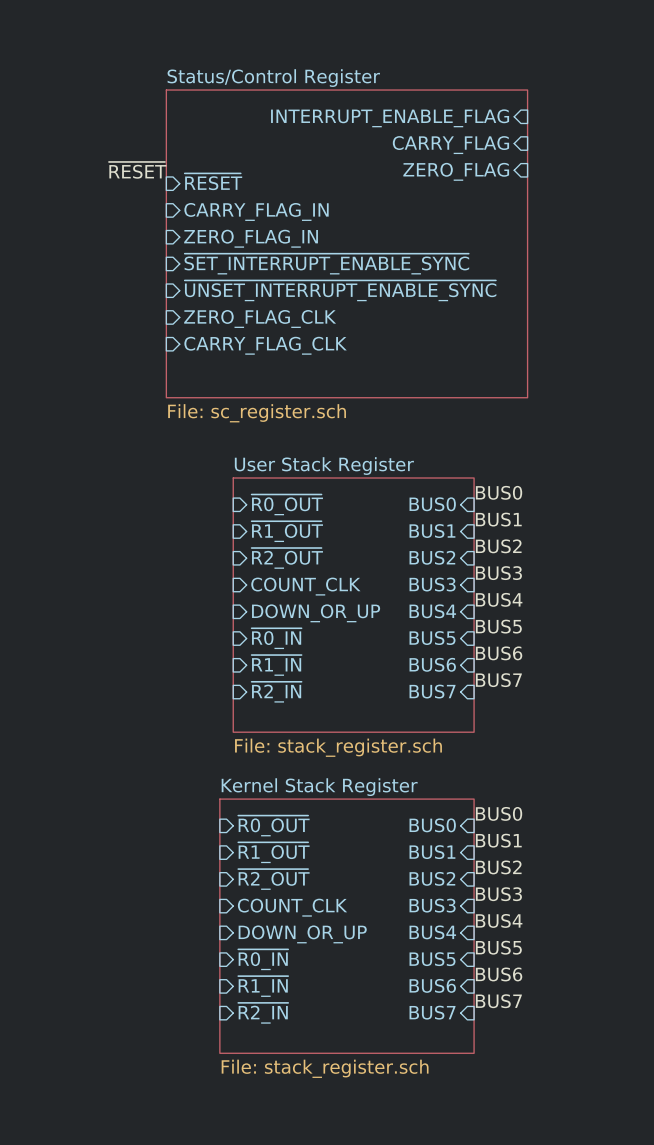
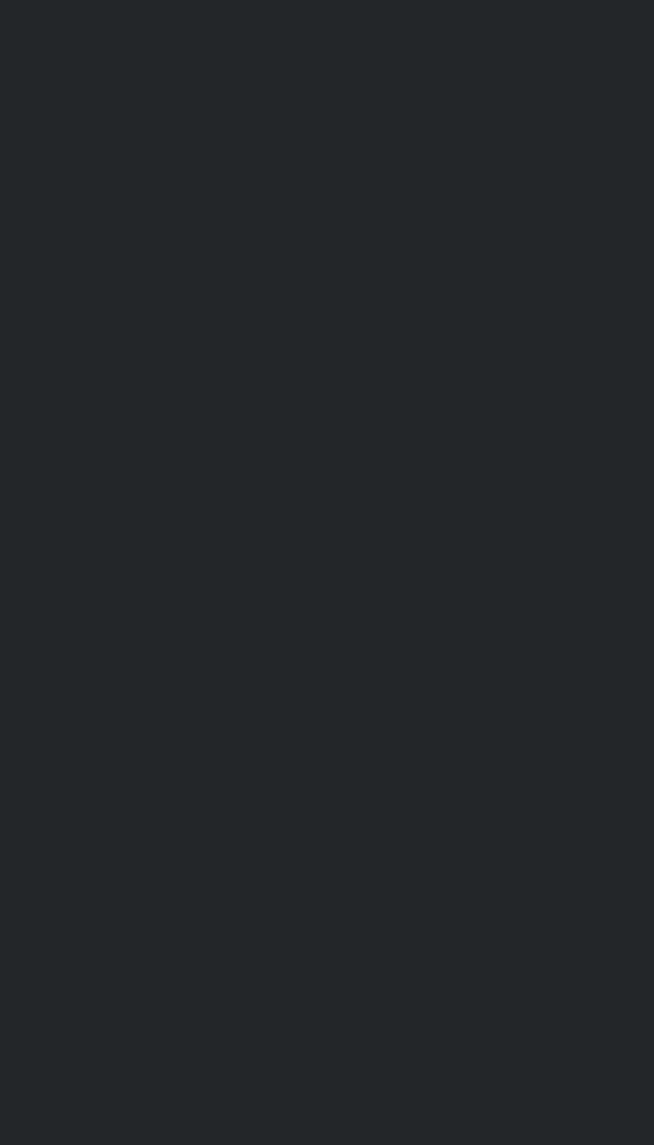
sheet pin: INTERRUPT_ENABLE_FLAG (390, 118) -> none
sheet pin: CARRY_FLAG (450, 145) -> none
label: ~{RESET} (137, 170) -> none
sheet pin: ZERO_FLAG (456, 171) -> none
sheet pin: ~{RESET} (213, 181) -> none
sheet pin: CARRY_FLAG_IN (256, 211) -> none
sheet pin: ZERO_FLAG_IN (251, 238) -> none
sheet Status/Control Register: File: sc_register.sch (346, 243) -> none
sheet pin: ~{SET_INTERRUPT_ENABLE_SYNC} (326, 264) -> none
sheet pin: ~{UNSET_INTERRUPT_ENABLE_SYNC} (340, 290) -> none
sheet pin: ZERO_FLAG_CLK (260, 319) -> none
sheet pin: CARRY_FLAG_CLK (265, 345) -> none
label: BUS0 (499, 492) -> none
sheet pin: ~{R0_OUT} (287, 504) -> none
sheet pin: BUS0 (432, 504) -> none
label: BUS1 (498, 519) -> none
sheet pin: ~{R1_OUT} (287, 531) -> none
sheet pin: BUS1 (432, 531) -> none
label: BUS2 (498, 546) -> none
sheet pin: BUS2 (432, 557) -> none
sheet pin: ~{R2_OUT} (287, 558) -> none
label: BUS3 (498, 573) -> none
sheet pin: BUS3 (432, 584) -> none
sheet pin: COUNT_CLK (305, 586) -> none
label: BUS4 (499, 599) -> none
sheet User Stack Register: File: stack_register.sch (353, 605) -> none
sheet pin: BUS4 (432, 611) -> none
sheet pin: DOWN_OR_UP (316, 613) -> none
label: BUS5 (498, 626) -> none
sheet pin: ~{R0_IN} (276, 638) -> none
sheet pin: BUS5 (432, 638) -> none
label: BUS6 (499, 653) -> none
sheet pin: BUS6 (432, 664) -> none
sheet pin: ~{R1_IN} (276, 665) -> none
label: BUS7 (498, 680) -> none
sheet pin: BUS7 (432, 691) -> none
sheet pin: ~{R2_IN} (276, 692) -> none
label: BUS0 (499, 813) -> none
sheet pin: ~{R0_OUT} (273, 825) -> none
sheet pin: BUS0 (432, 825) -> none
label: BUS1 (498, 840) -> none
sheet pin: ~{R1_OUT} (273, 852) -> none
sheet pin: BUS1 (432, 852) -> none
label: BUS2 (498, 867) -> none
sheet pin: BUS2 (432, 878) -> none
sheet pin: ~{R2_OUT} (273, 879) -> none
label: BUS3 (498, 894) -> none
sheet pin: BUS3 (432, 905) -> none
sheet pin: COUNT_CLK (292, 907) -> none
label: BUS4 (499, 920) -> none
sheet Kernel Stack Register: File: stack_register.sch (346, 926) -> none
sheet pin: BUS4 (432, 932) -> none
sheet pin: DOWN_OR_UP (302, 934) -> none
label: BUS5 (498, 947) -> none
sheet pin: ~{R0_IN} (263, 959) -> none
sheet pin: BUS5 (432, 959) -> none
label: BUS6 (499, 974) -> none
sheet pin: BUS6 (432, 985) -> none
sheet pin: ~{R1_IN} (263, 986) -> none
label: BUS7 (498, 1001) -> none
sheet pin: BUS7 (432, 1012) -> none
sheet pin: ~{R2_IN} (263, 1013) -> none

